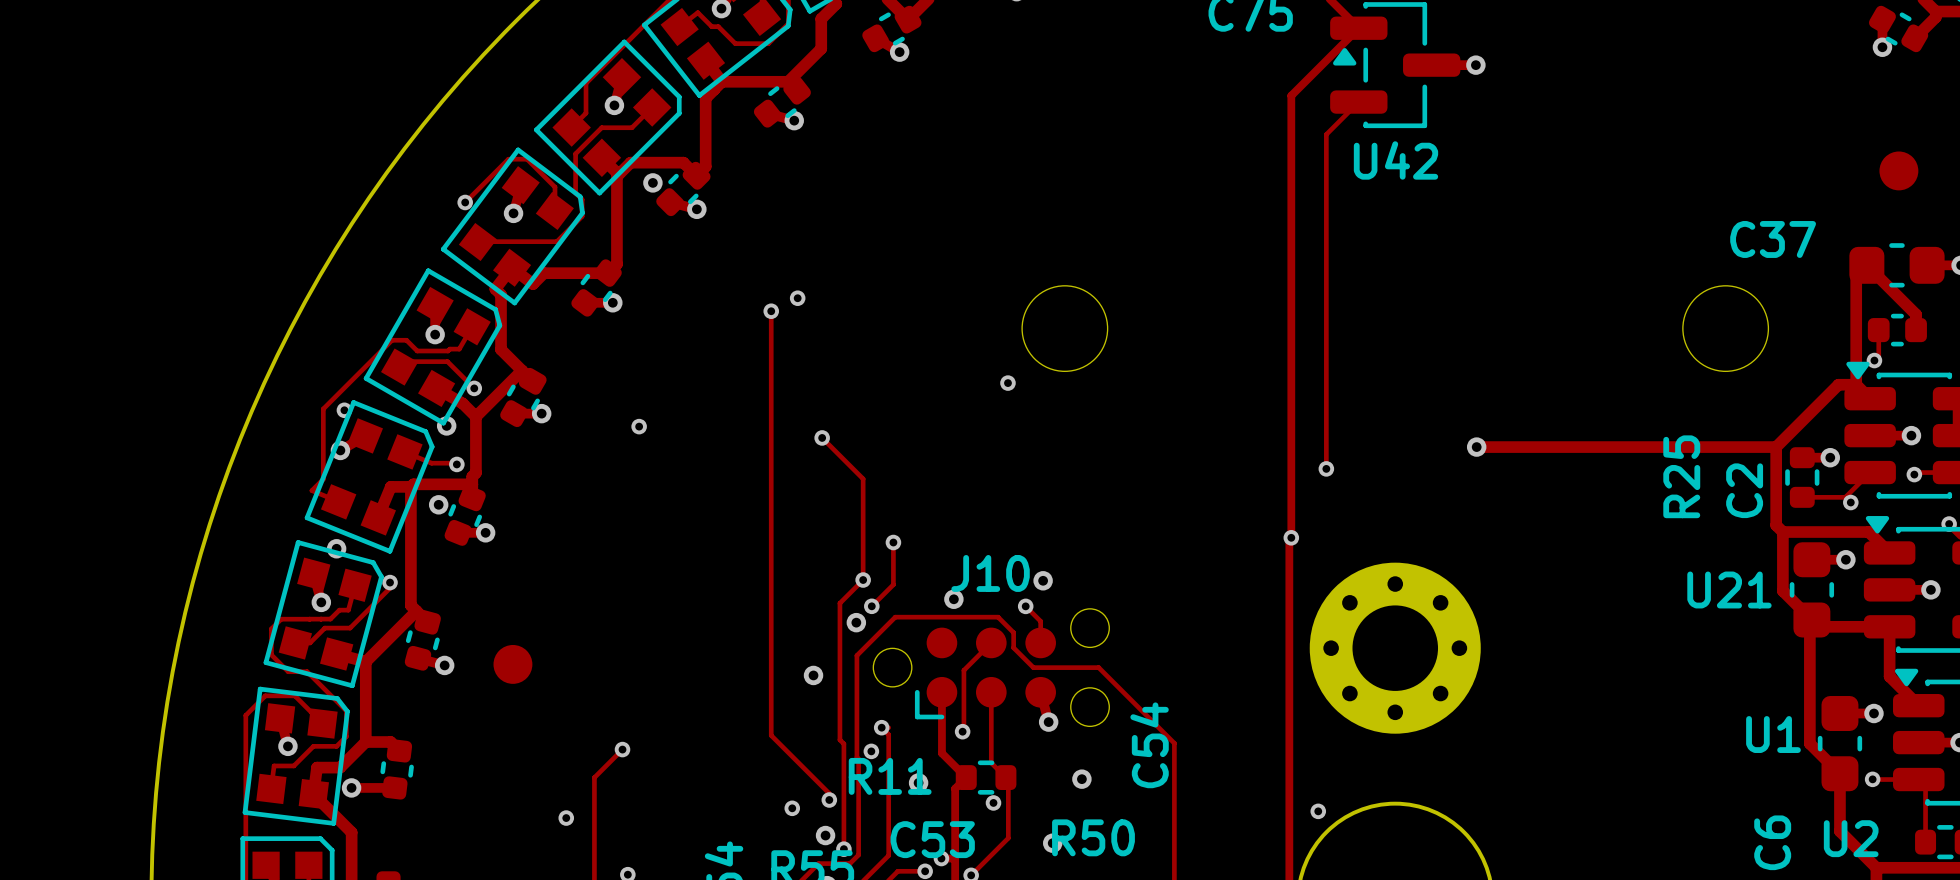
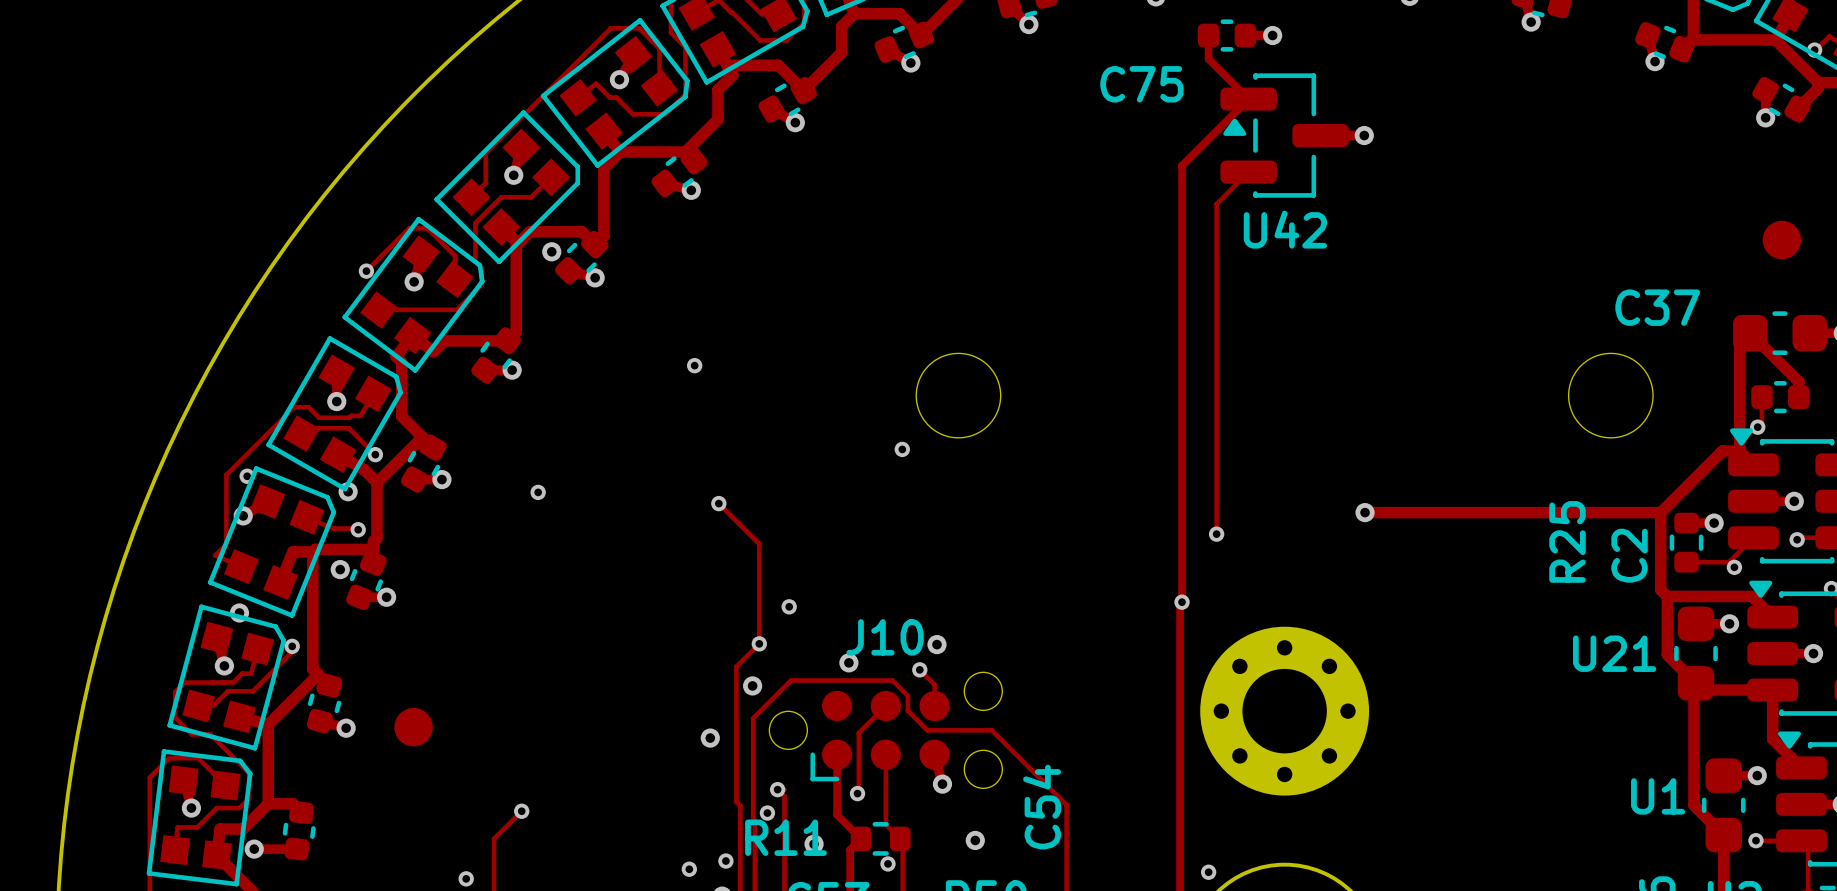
track: (771, 311) (771, 735) (829, 793) (829, 800) -> none
via: (771, 311) -> none
track: (893, 542) (893, 584) (871, 606) -> none
via: (871, 606) -> none

